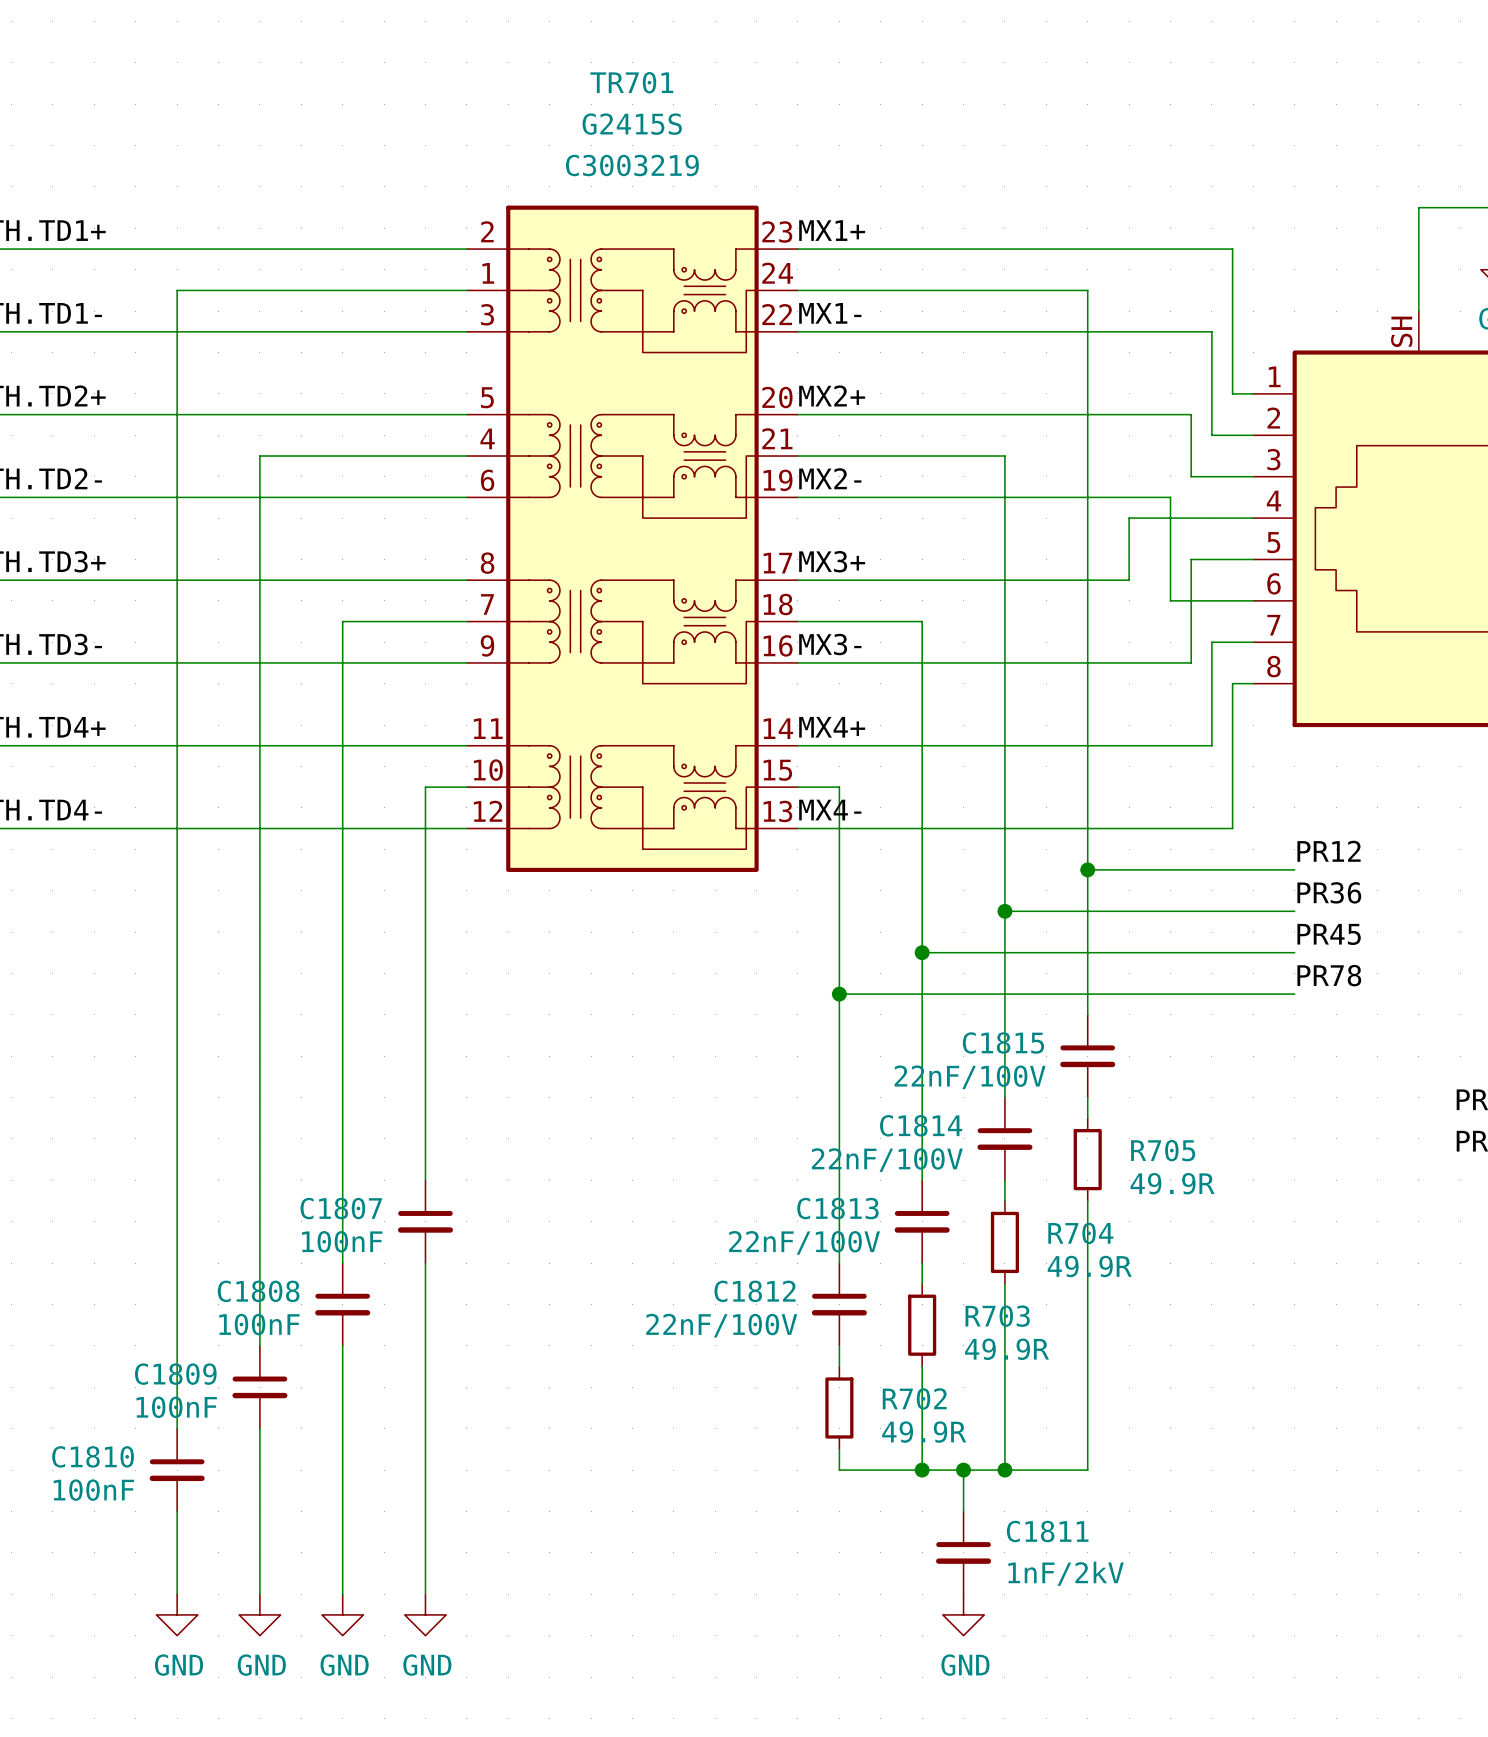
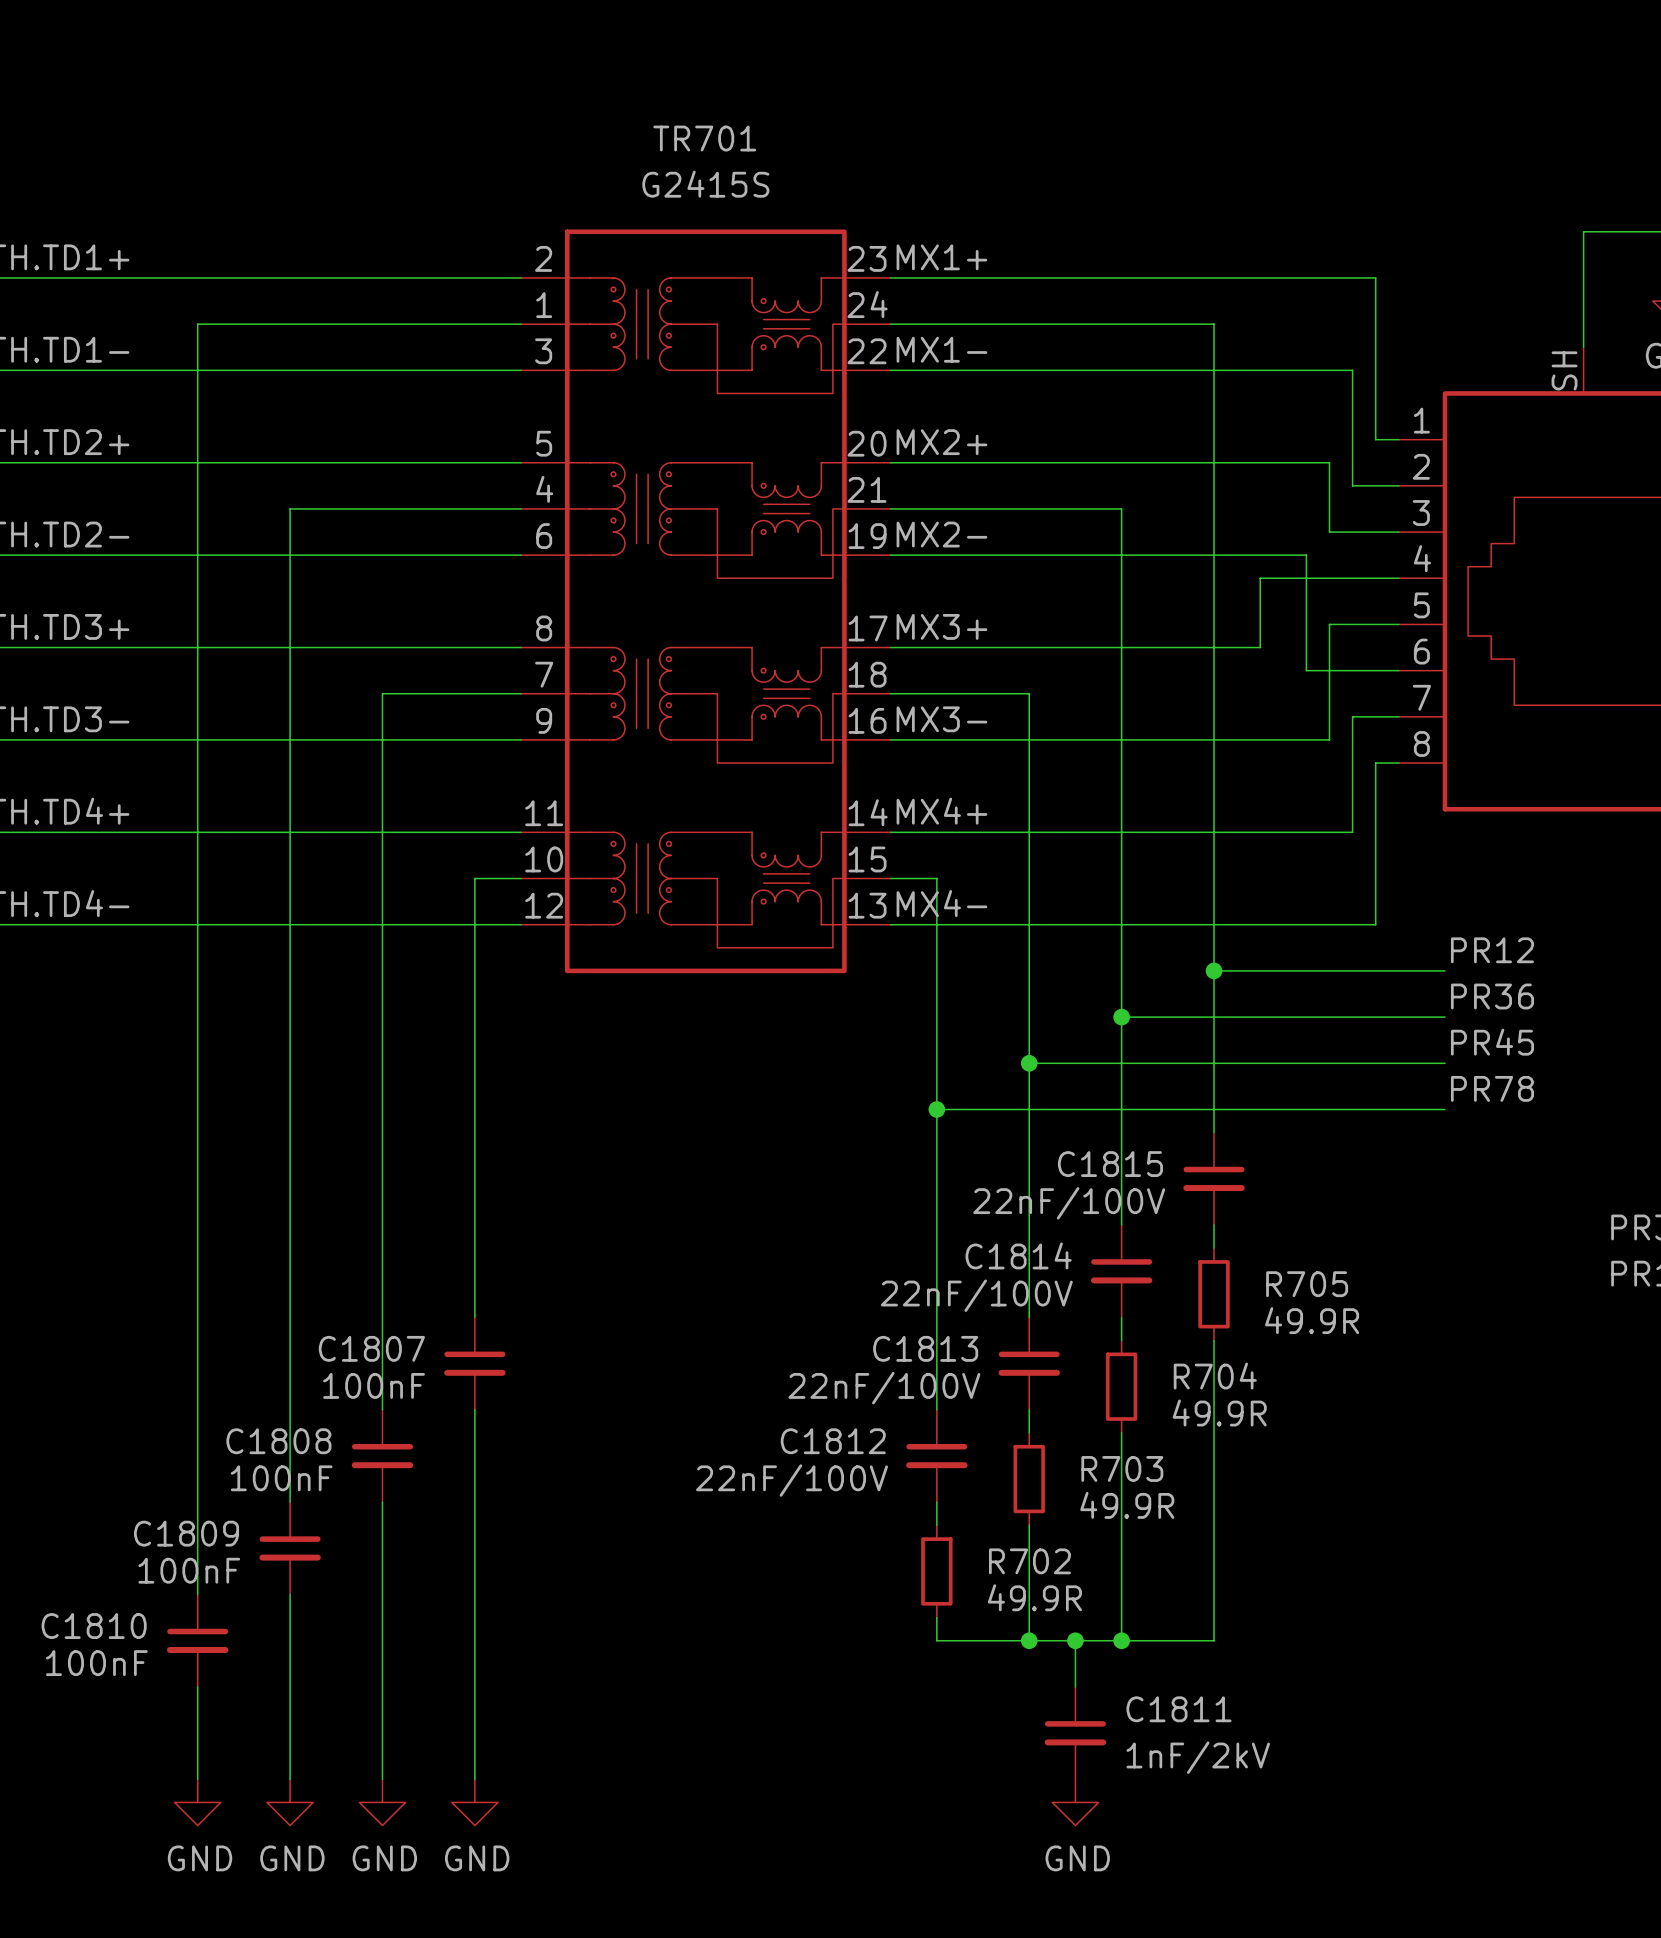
TR701 name position: TR701 (631, 82) -> TR701 (704, 138)
TR701 value position: G2415S (632, 124) -> G2415S (705, 184)
TR701 text: C3003219 (632, 165) -> none

